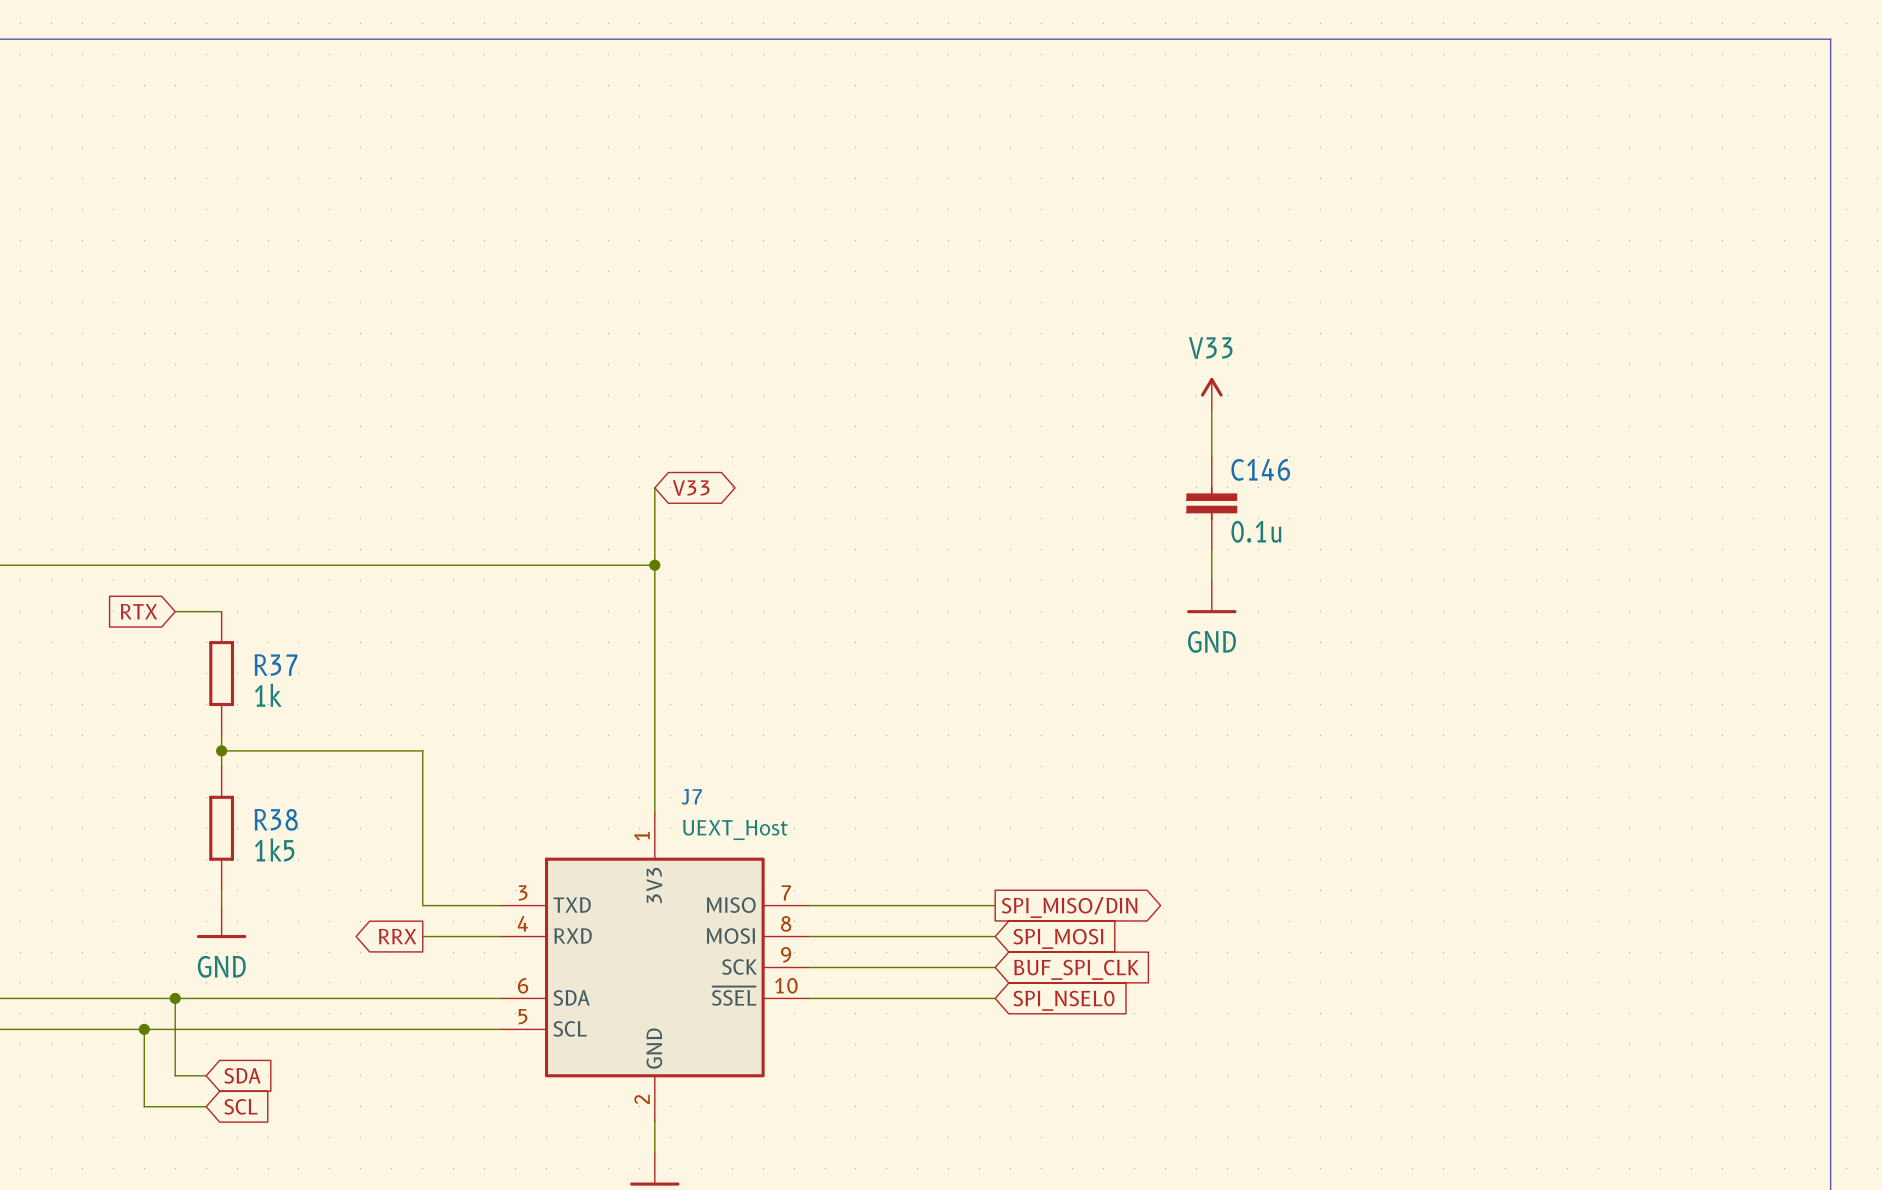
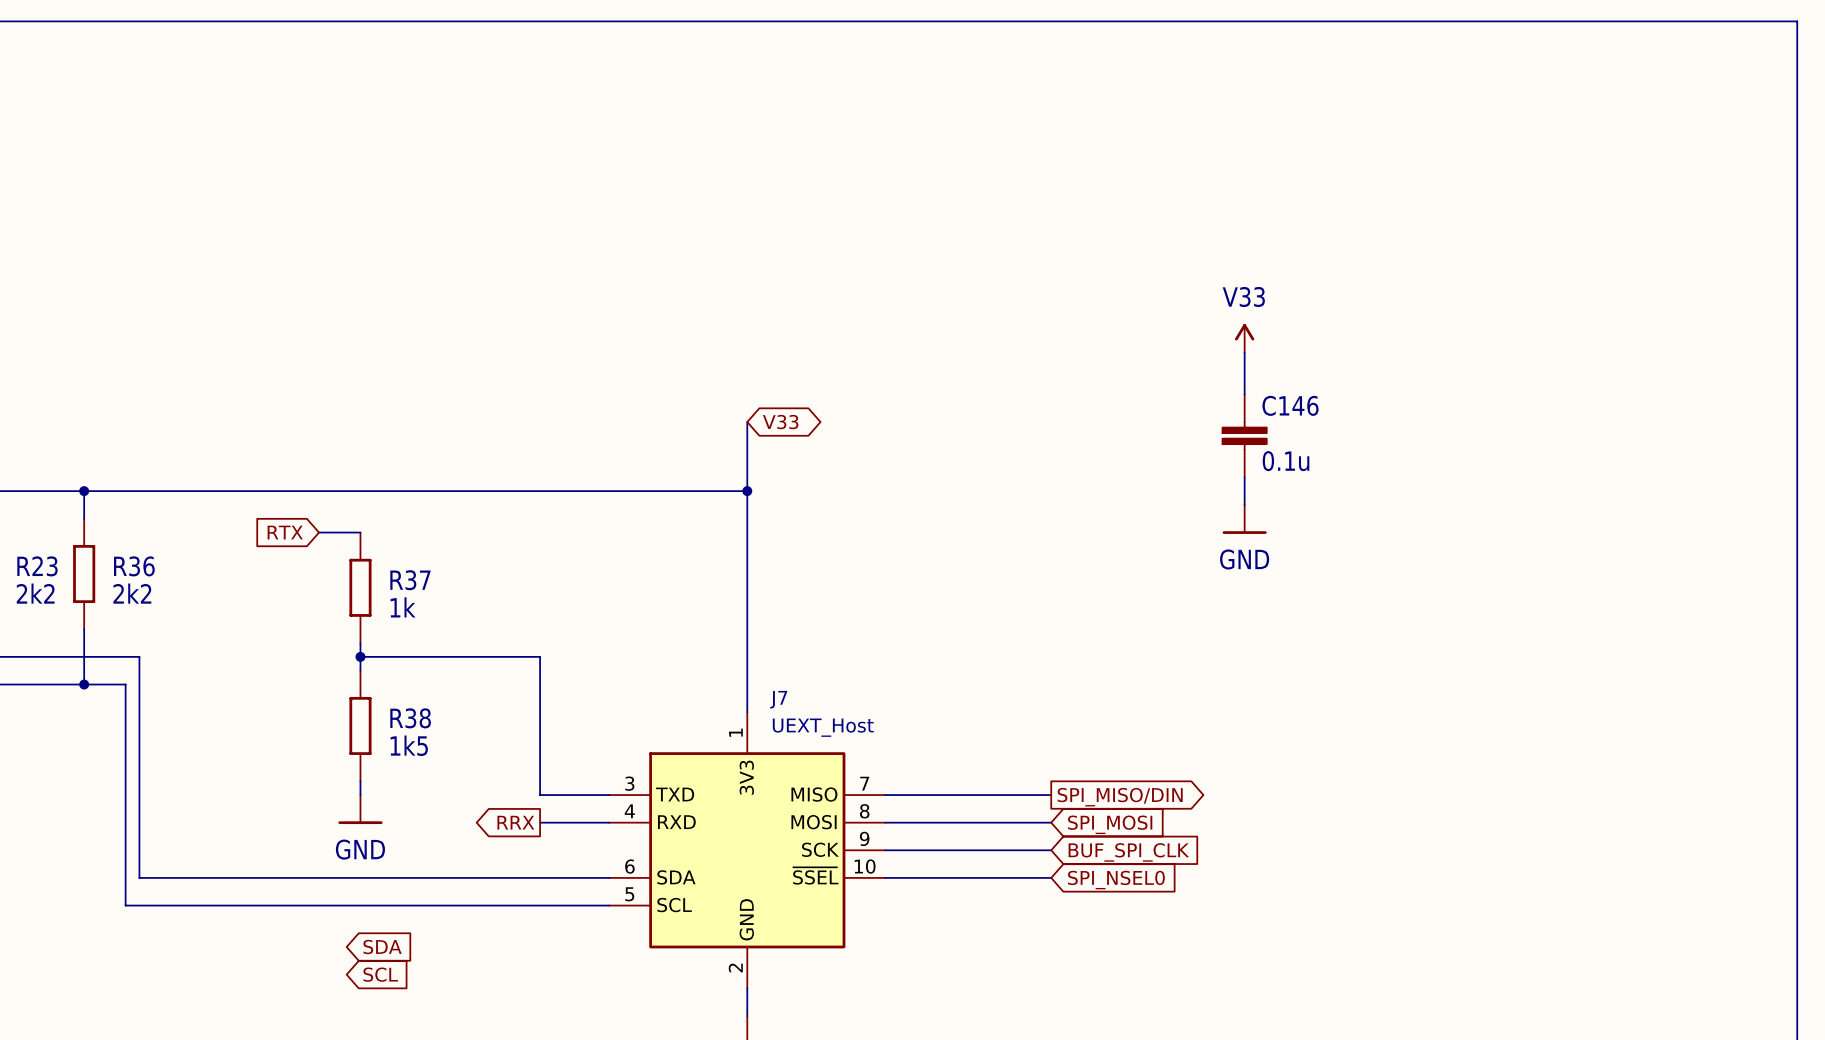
wire: (175, 998) (175, 1075) (206, 1075) -> none
junction: (175, 998) -> none
wire: (144, 1029) (144, 1106) (206, 1106) -> none
junction: (144, 1029) -> none

